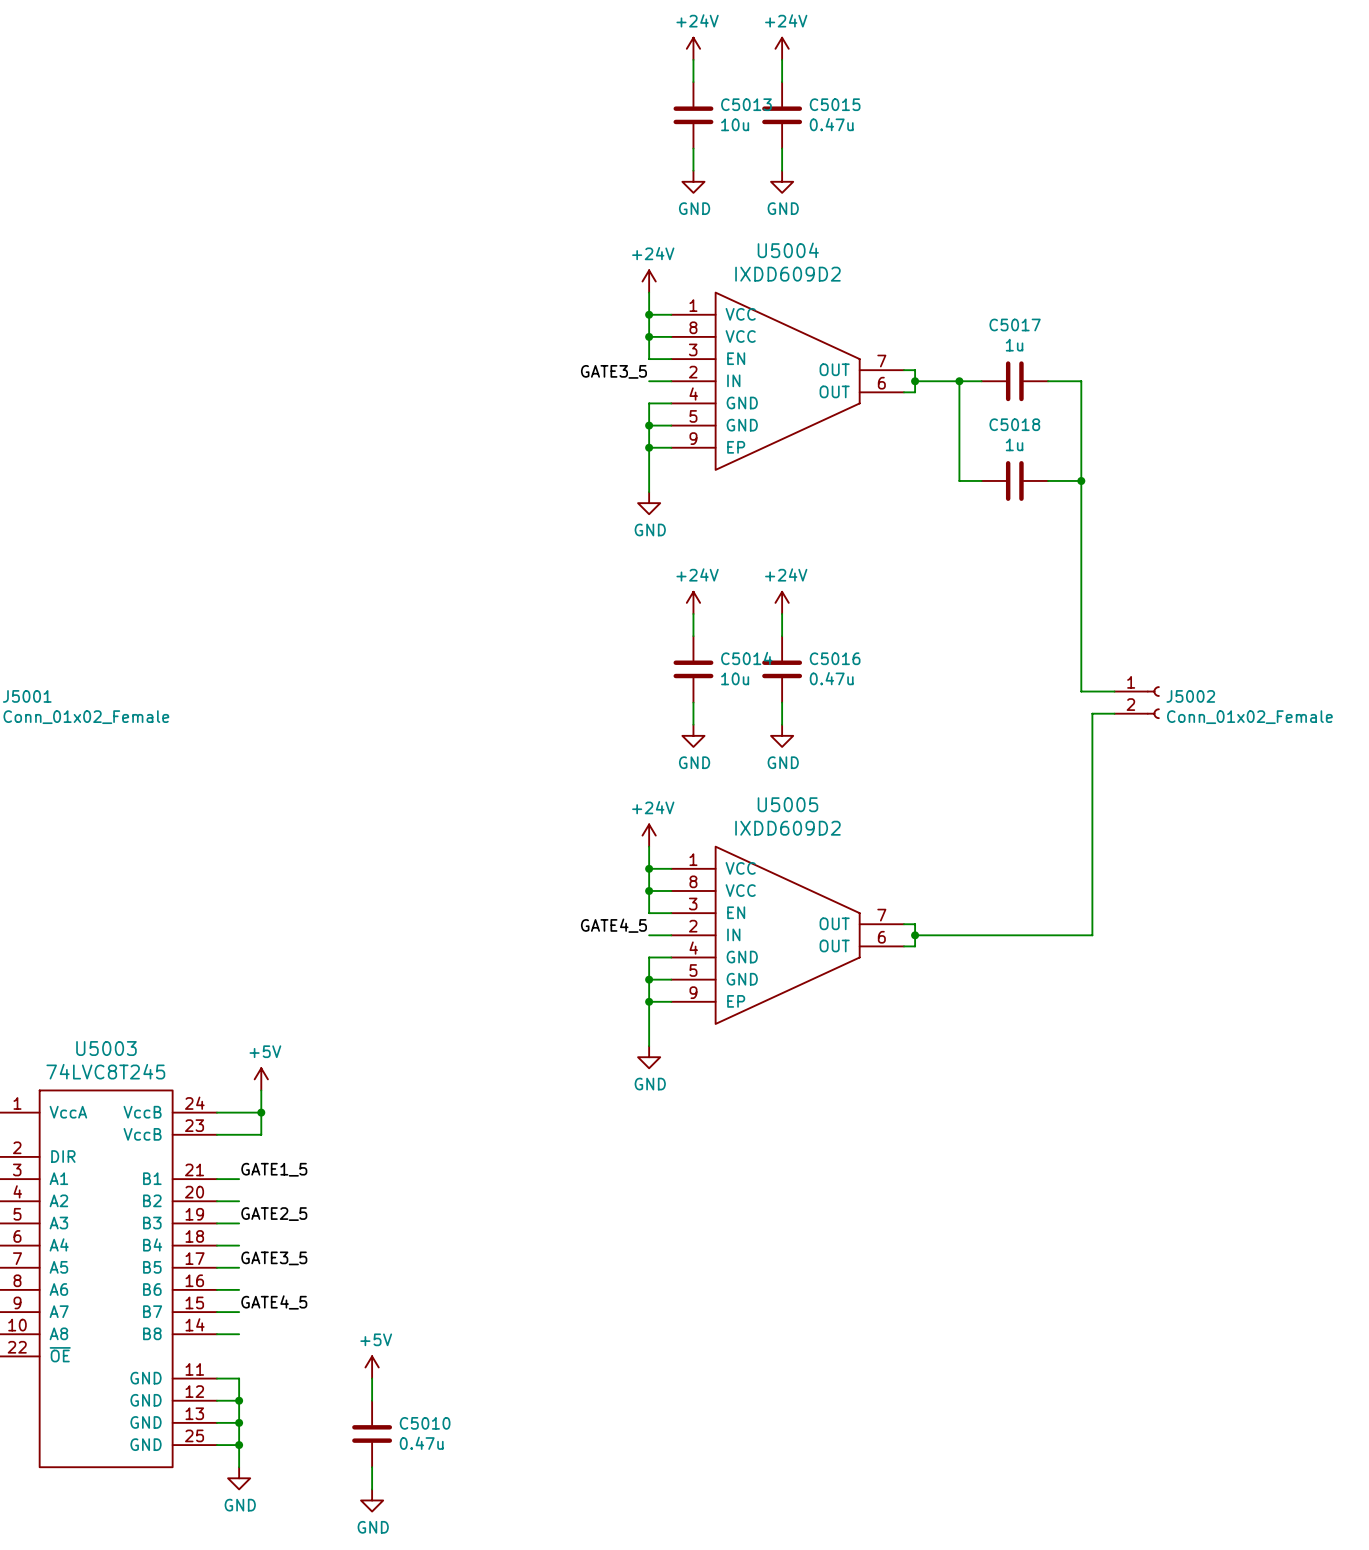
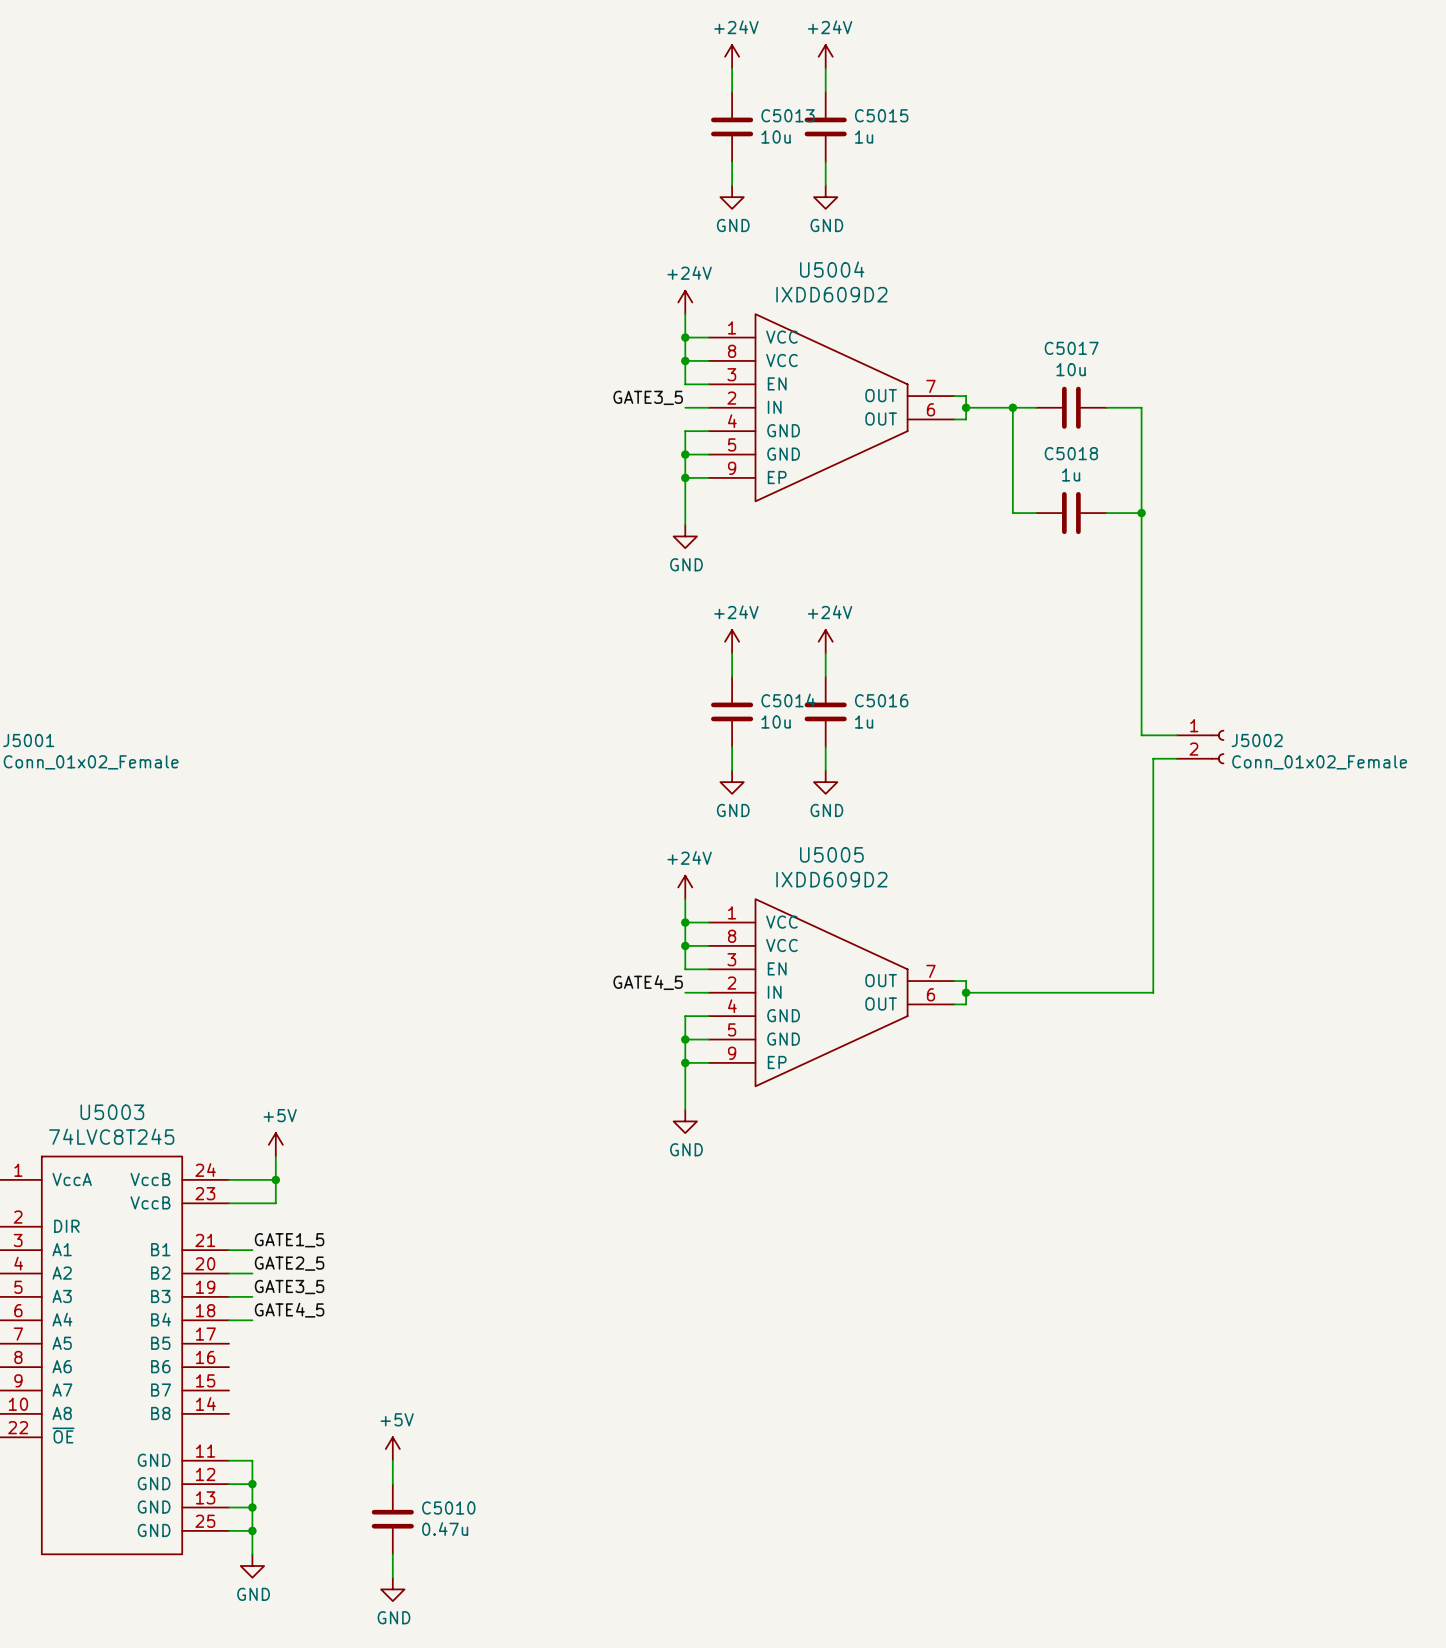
C5015 value: 0.47u (831, 124) -> 1u (864, 137)
C5017 value: 1u (1014, 345) -> 10u (1071, 369)
C5016 value: 0.47u (831, 678) -> 1u (864, 722)
label: none -> GATE2_5 (289, 1263)
label: GATE2_5 (274, 1214) -> GATE3_5 (289, 1287)
label: GATE3_5 (274, 1258) -> none
wire: (216, 1267) (239, 1267) -> none
wire: (216, 1289) (239, 1289) -> none
label position: GATE4_5 (274, 1302) -> GATE4_5 (289, 1310)
wire: (216, 1312) (239, 1312) -> none
wire: (216, 1334) (239, 1334) -> none

